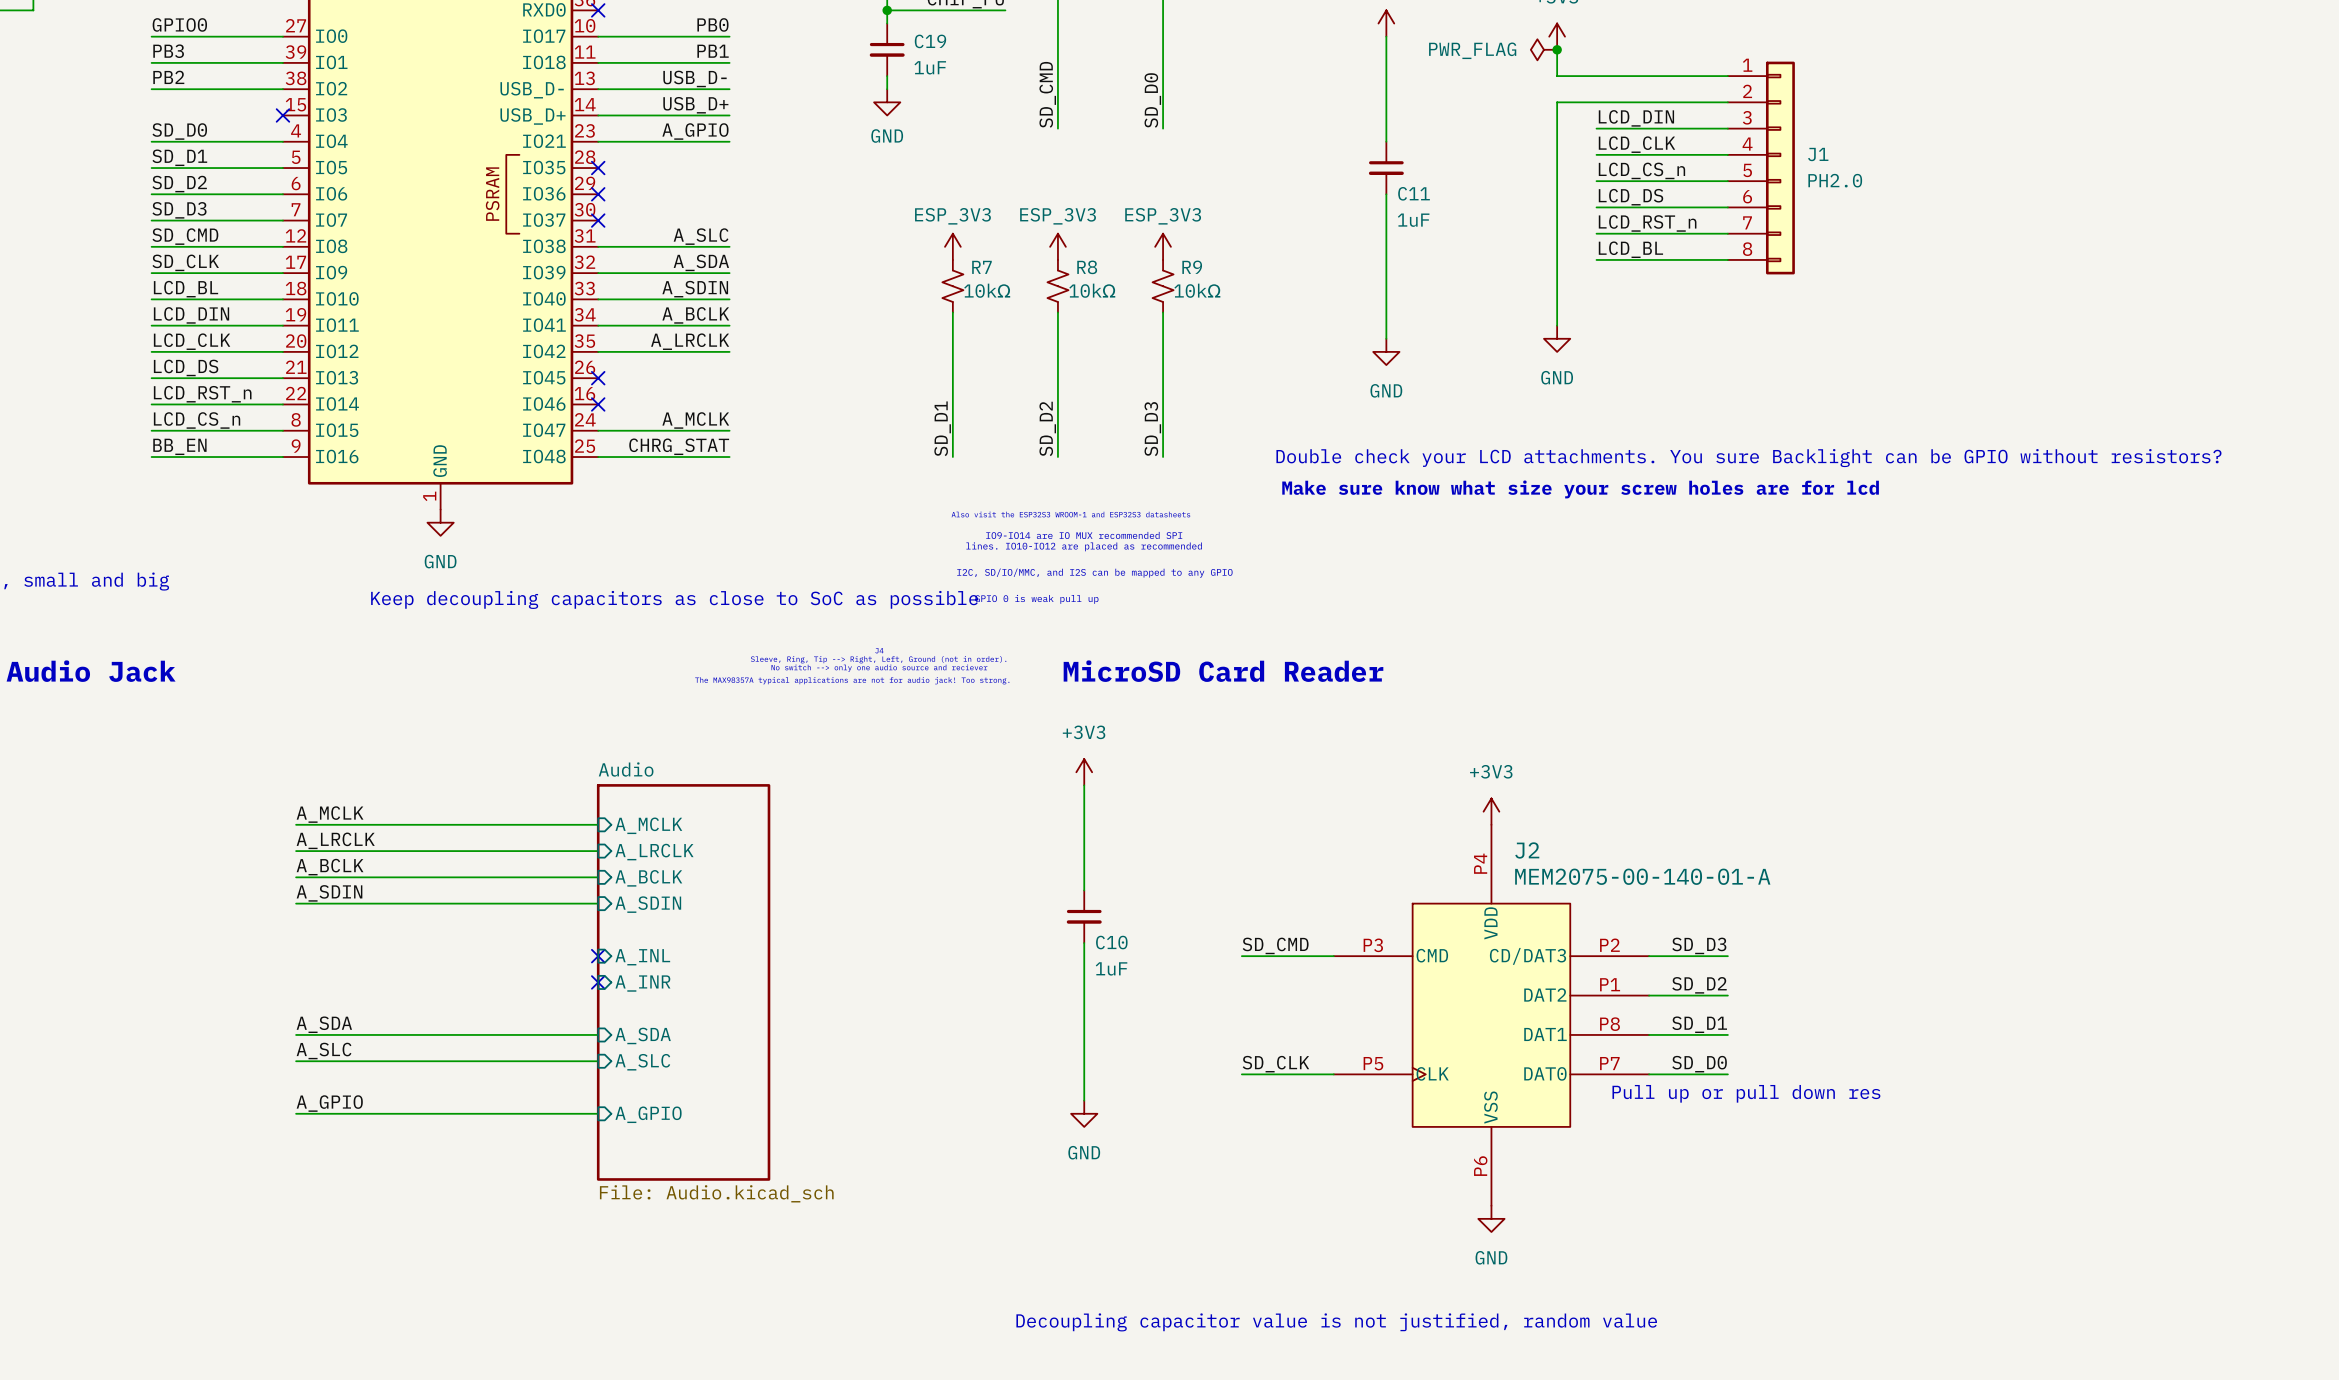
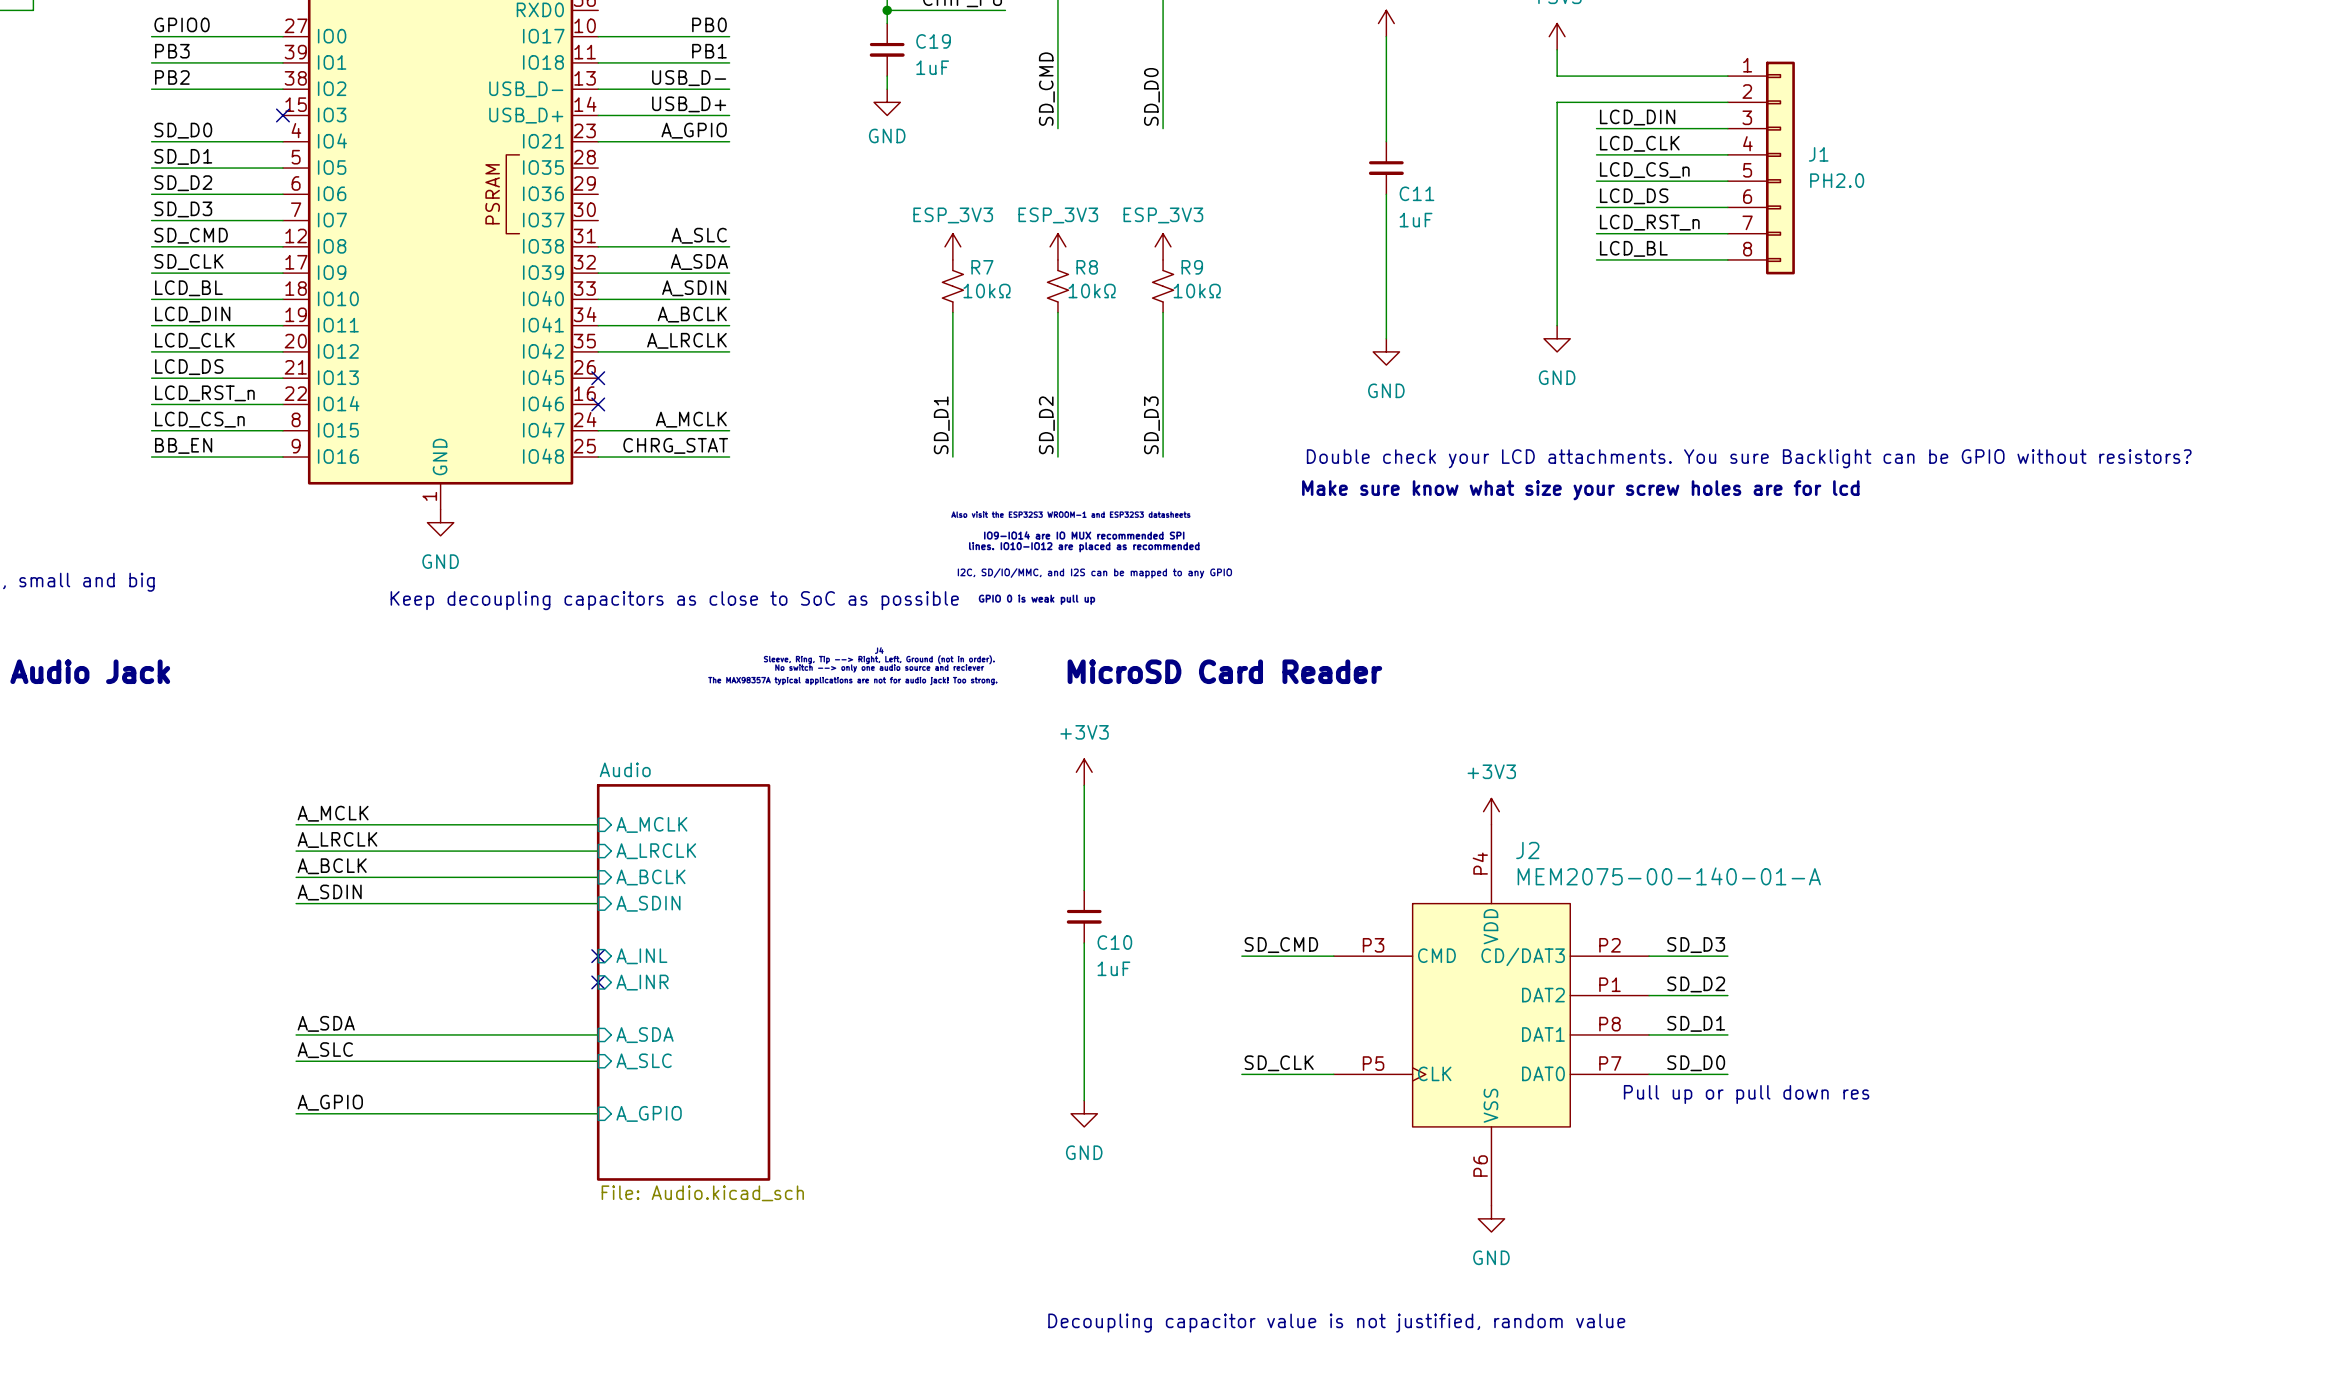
no-connect mark: (598, 10) -> none
power symbol: PWR_FLAG (1543, 49) -> none
junction: (1557, 49) -> none
no-connect mark: (598, 168) -> none
no-connect mark: (598, 194) -> none
no-connect mark: (598, 220) -> none

